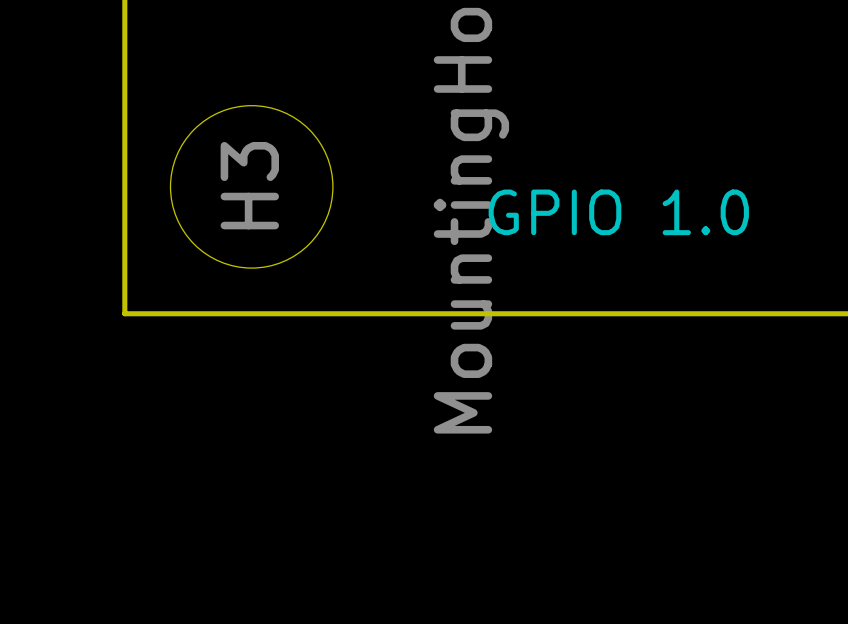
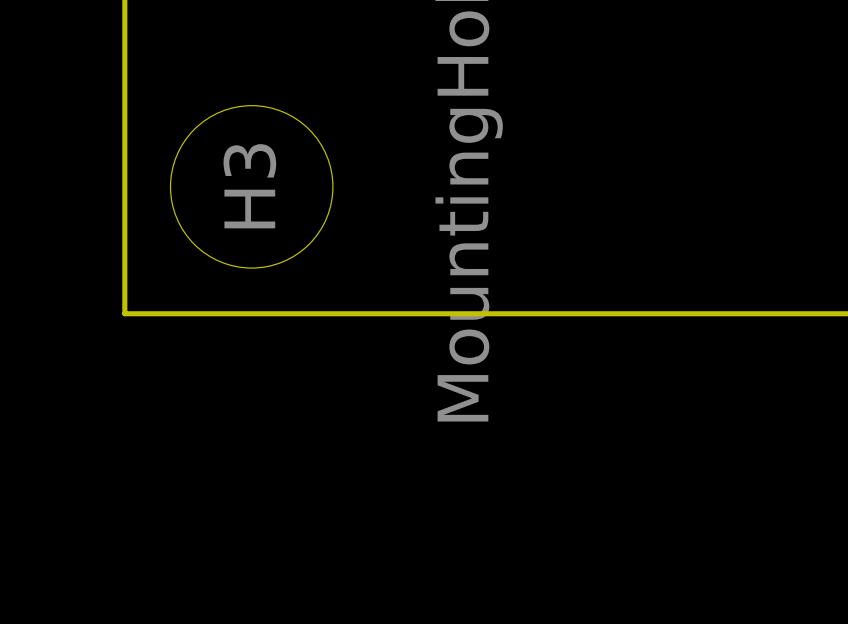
text: GPIO 1.0 (618, 212) -> none

